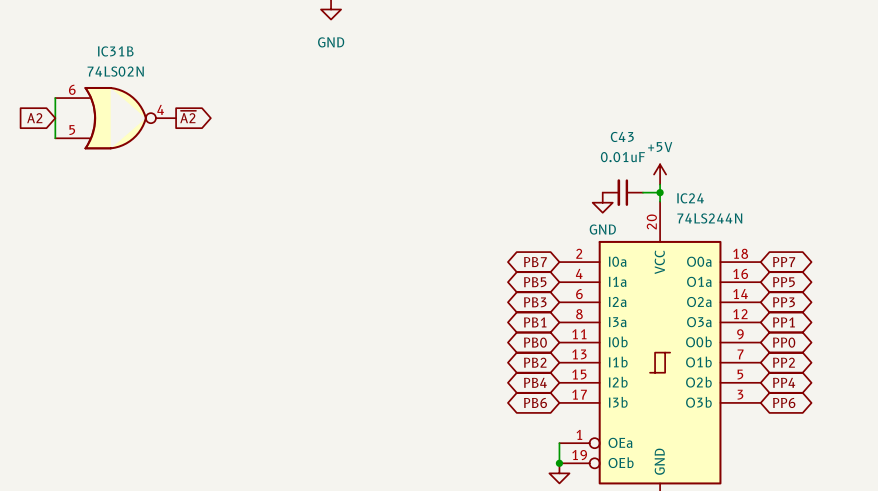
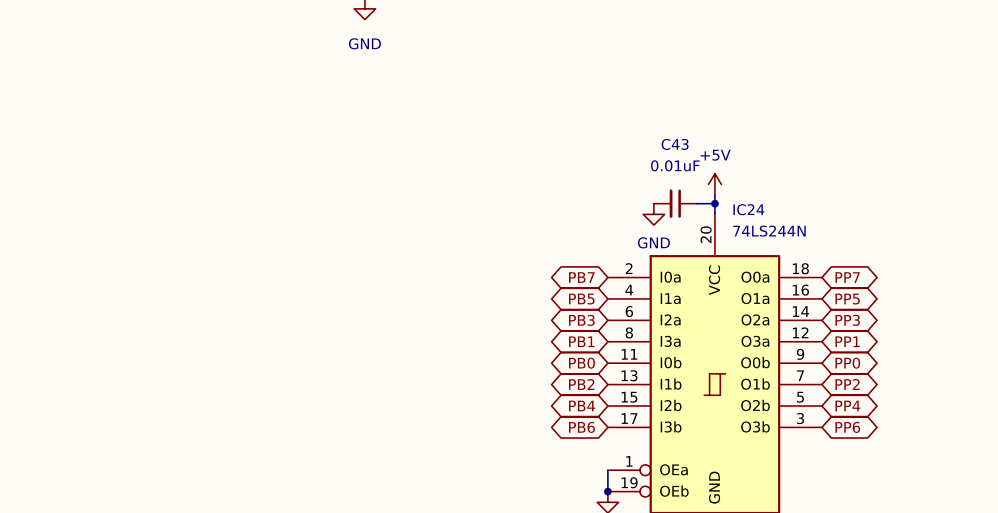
wire: (55, 98) (55, 138) -> none
global label: ~{A2} (188, 117) -> none
global label: A2 (34, 118) -> none
IC31B: 74LS02N (115, 118) -> none

